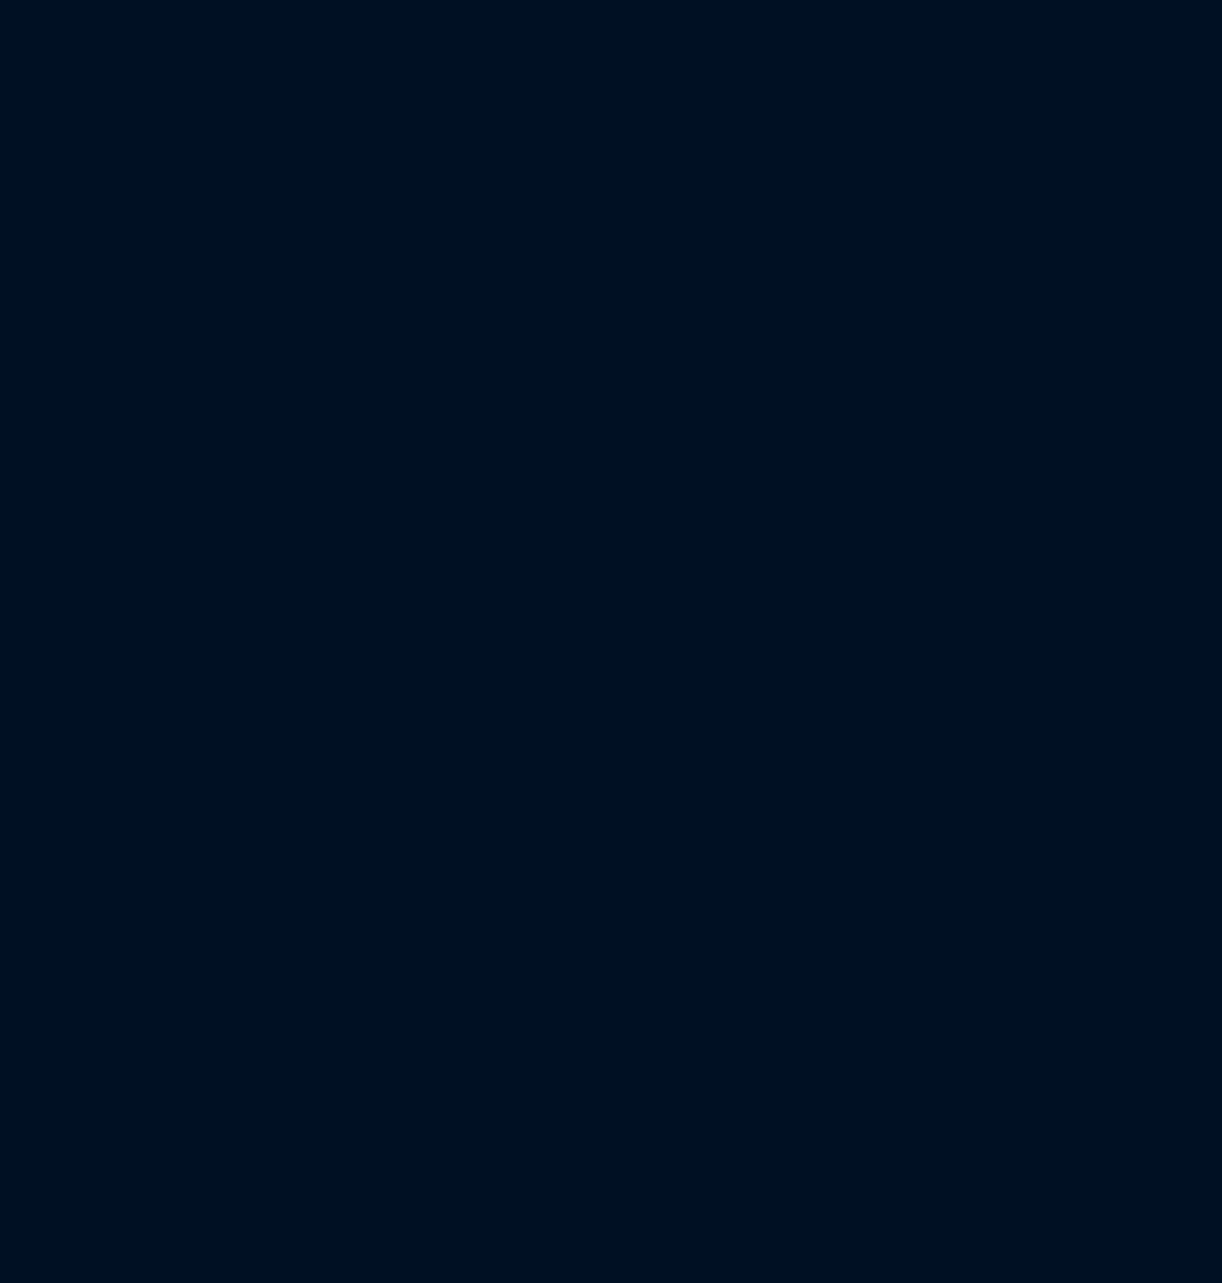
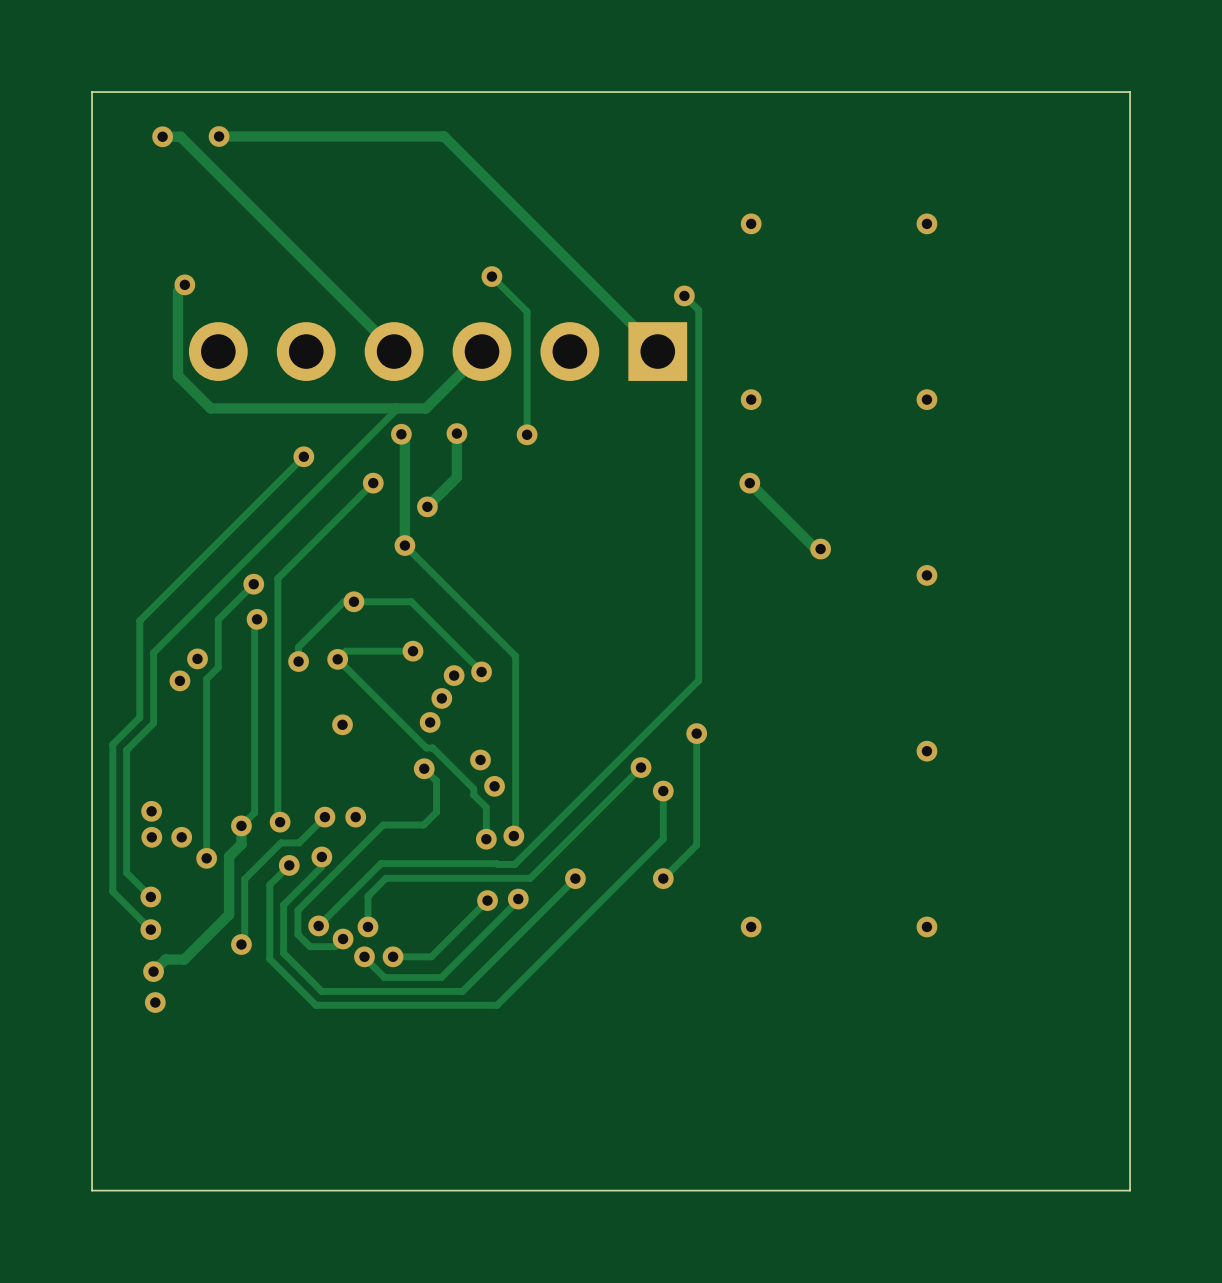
board edge: none -> (1130, 92) (1130, 1190) (92, 1190) (92, 92) (1130, 92)
track: none -> (162, 136) (180, 136) (395, 351)
via: none -> (162, 136)
track: none -> (219, 136) (444, 136) (658, 351)
via: none -> (219, 136)
via: none -> (751, 223)
via: none -> (926, 223)
track: none -> (491, 276) (527, 311) (527, 434)
via: none -> (491, 276)
track: none -> (184, 284) (177, 291) (177, 375) (210, 408) (426, 408) (483, 351)
via: none -> (184, 284)
track: none -> (684, 295) (698, 310) (698, 680) (514, 864) (380, 863) (318, 925)
via: none -> (684, 295)
part: none -> (438, 351)
via: none -> (751, 399)
via: none -> (926, 399)
track: none -> (396, 408) (153, 652) (153, 723) (126, 750) (126, 872) (150, 896)
track: none -> (456, 433) (456, 477) (427, 506)
via: none -> (456, 433)
track: none -> (401, 434) (404, 437) (404, 545) (515, 656) (515, 834) (513, 836)
via: none -> (401, 434)
via: none -> (527, 434)
track: none -> (303, 456) (139, 620) (139, 717) (112, 744) (112, 891) (150, 929)
via: none -> (303, 456)
track: none -> (373, 483) (277, 578) (277, 819) (280, 822)
via: none -> (373, 483)
track: none -> (749, 483) (815, 549) (820, 549)
via: none -> (749, 483)
via: none -> (427, 506)
via: none -> (404, 545)
via: none -> (820, 549)
via: none -> (926, 575)
track: none -> (253, 584) (218, 619) (218, 667) (206, 679) (206, 858)
via: none -> (253, 584)
via: none -> (353, 601)
track: none -> (257, 619) (254, 621) (254, 812) (241, 825) (241, 844) (229, 856) (229, 914) (184, 959) (165, 959) (153, 971)
via: none -> (257, 619)
track: none -> (413, 651) (345, 651) (337, 659) (426, 748) (432, 748) (473, 788) (473, 794) (486, 807) (486, 839)
via: none -> (413, 651)
via: none -> (197, 658)
via: none -> (337, 659)
track: none -> (298, 661) (298, 647) (343, 601) (411, 601) (481, 671)
via: none -> (298, 661)
via: none -> (481, 671)
via: none -> (454, 675)
via: none -> (179, 680)
via: none -> (441, 698)
via: none -> (430, 722)
via: none -> (342, 724)
track: none -> (696, 733) (696, 845) (663, 878)
via: none -> (696, 733)
via: none -> (926, 751)
via: none -> (480, 759)
track: none -> (641, 767) (530, 878) (385, 878) (367, 896) (367, 926)
via: none -> (641, 767)
track: none -> (424, 768) (436, 781) (436, 812) (423, 825) (383, 825) (297, 910) (297, 934) (310, 946) (335, 946) (343, 939)
via: none -> (424, 768)
via: none -> (494, 786)
track: none -> (663, 791) (663, 839) (497, 1005) (315, 1005) (269, 959) (269, 884) (289, 865)
via: none -> (663, 791)
via: none -> (151, 811)
track: none -> (324, 817) (299, 842) (280, 842) (244, 879) (244, 941) (241, 944)
via: none -> (324, 817)
via: none -> (355, 817)
via: none -> (280, 822)
via: none -> (241, 825)
via: none -> (513, 836)
via: none -> (151, 837)
via: none -> (181, 837)
via: none -> (486, 839)
track: none -> (321, 856) (321, 866) (283, 904) (283, 953) (321, 991) (462, 991) (575, 878)
via: none -> (321, 856)
via: none -> (206, 858)
via: none -> (289, 865)
via: none -> (575, 878)
via: none -> (663, 878)
via: none -> (150, 896)
track: none -> (518, 899) (441, 977) (384, 977) (364, 956)
via: none -> (518, 899)
track: none -> (487, 900) (431, 956) (393, 956)
via: none -> (487, 900)
via: none -> (318, 925)
via: none -> (367, 926)
via: none -> (751, 926)
via: none -> (926, 926)
via: none -> (150, 929)
via: none -> (343, 939)
via: none -> (241, 944)
via: none -> (364, 956)
via: none -> (393, 956)
via: none -> (153, 971)
via: none -> (155, 1002)

